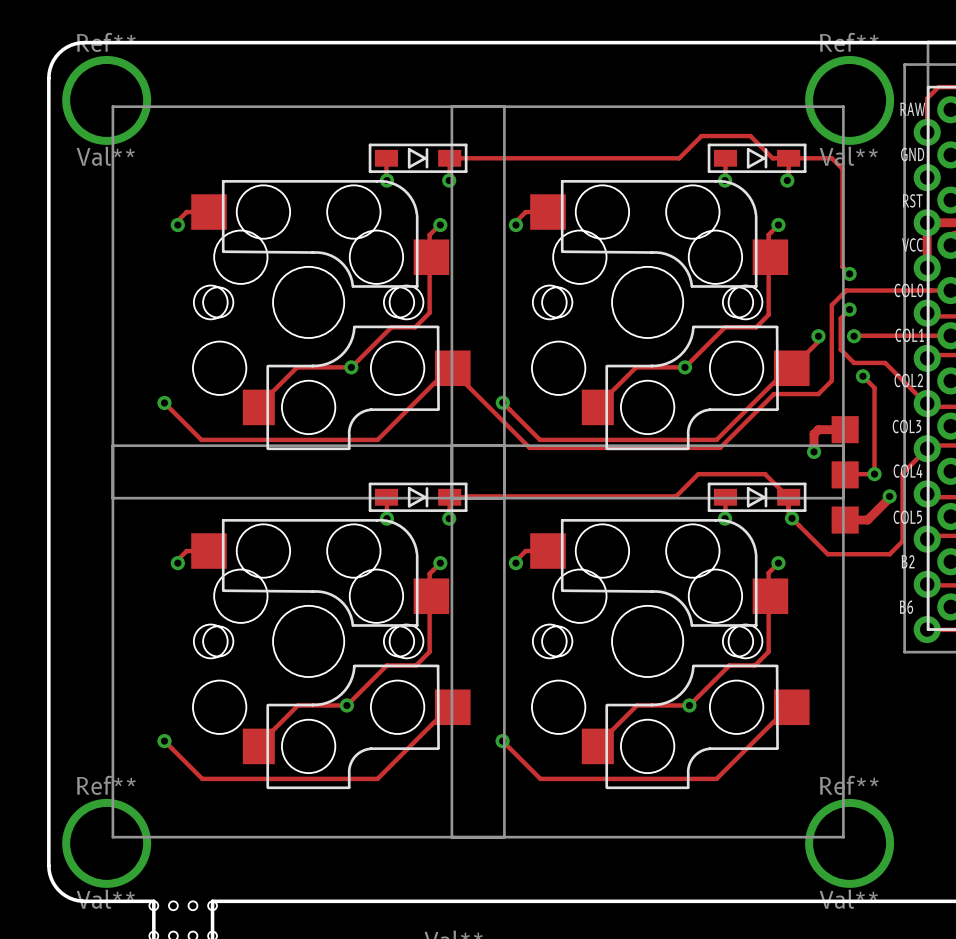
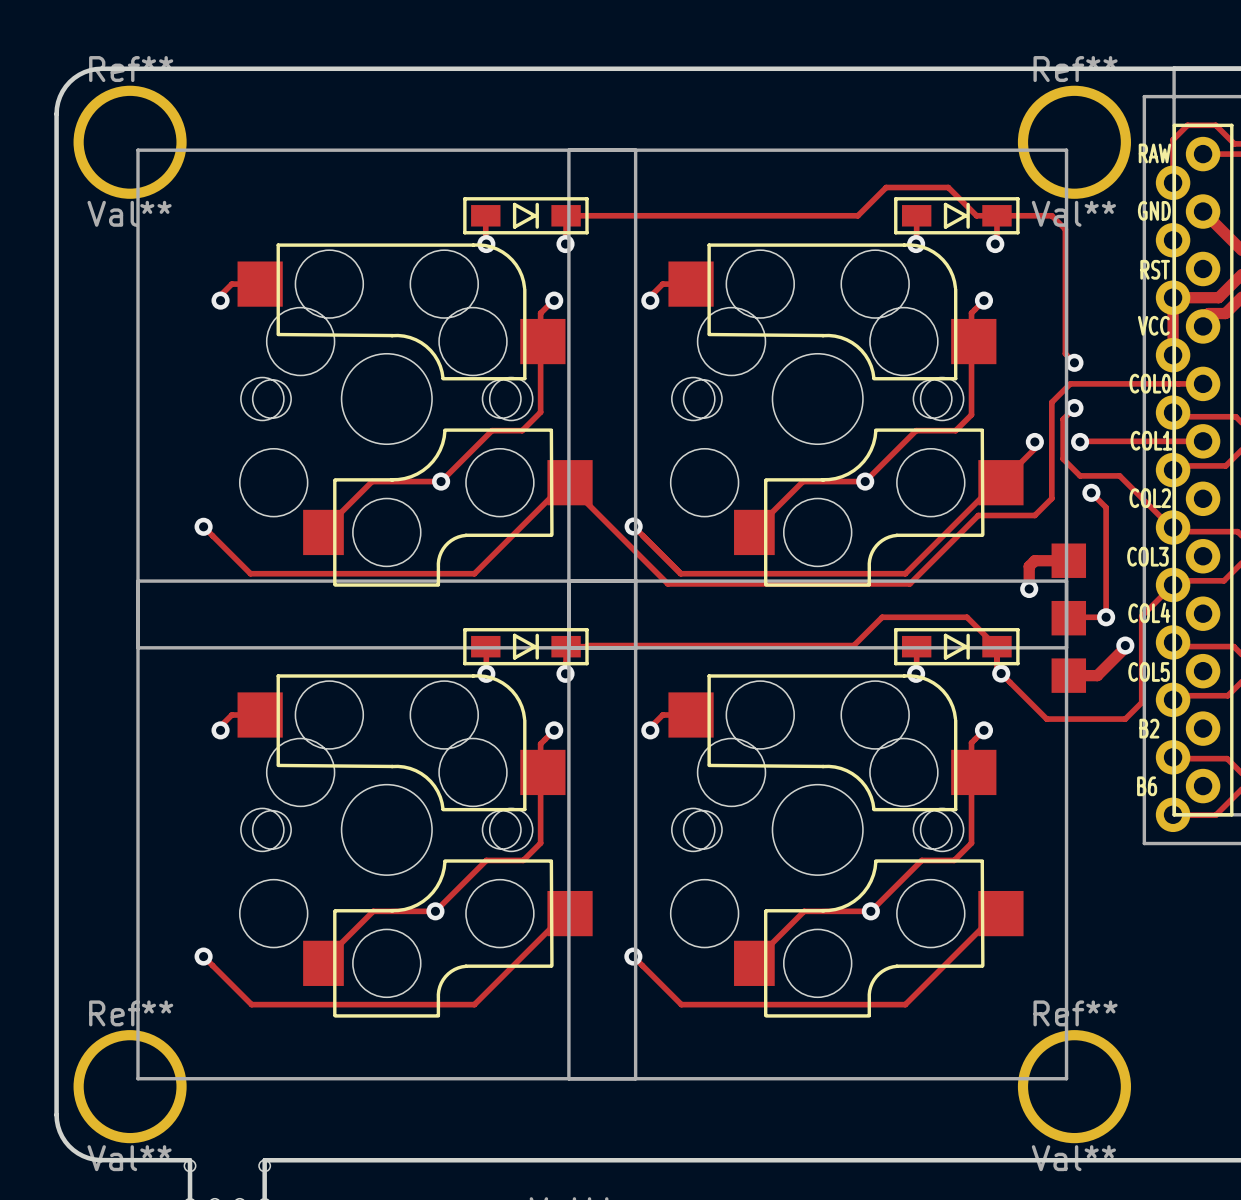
part: (173, 905) -> none
part: (192, 905) -> none

